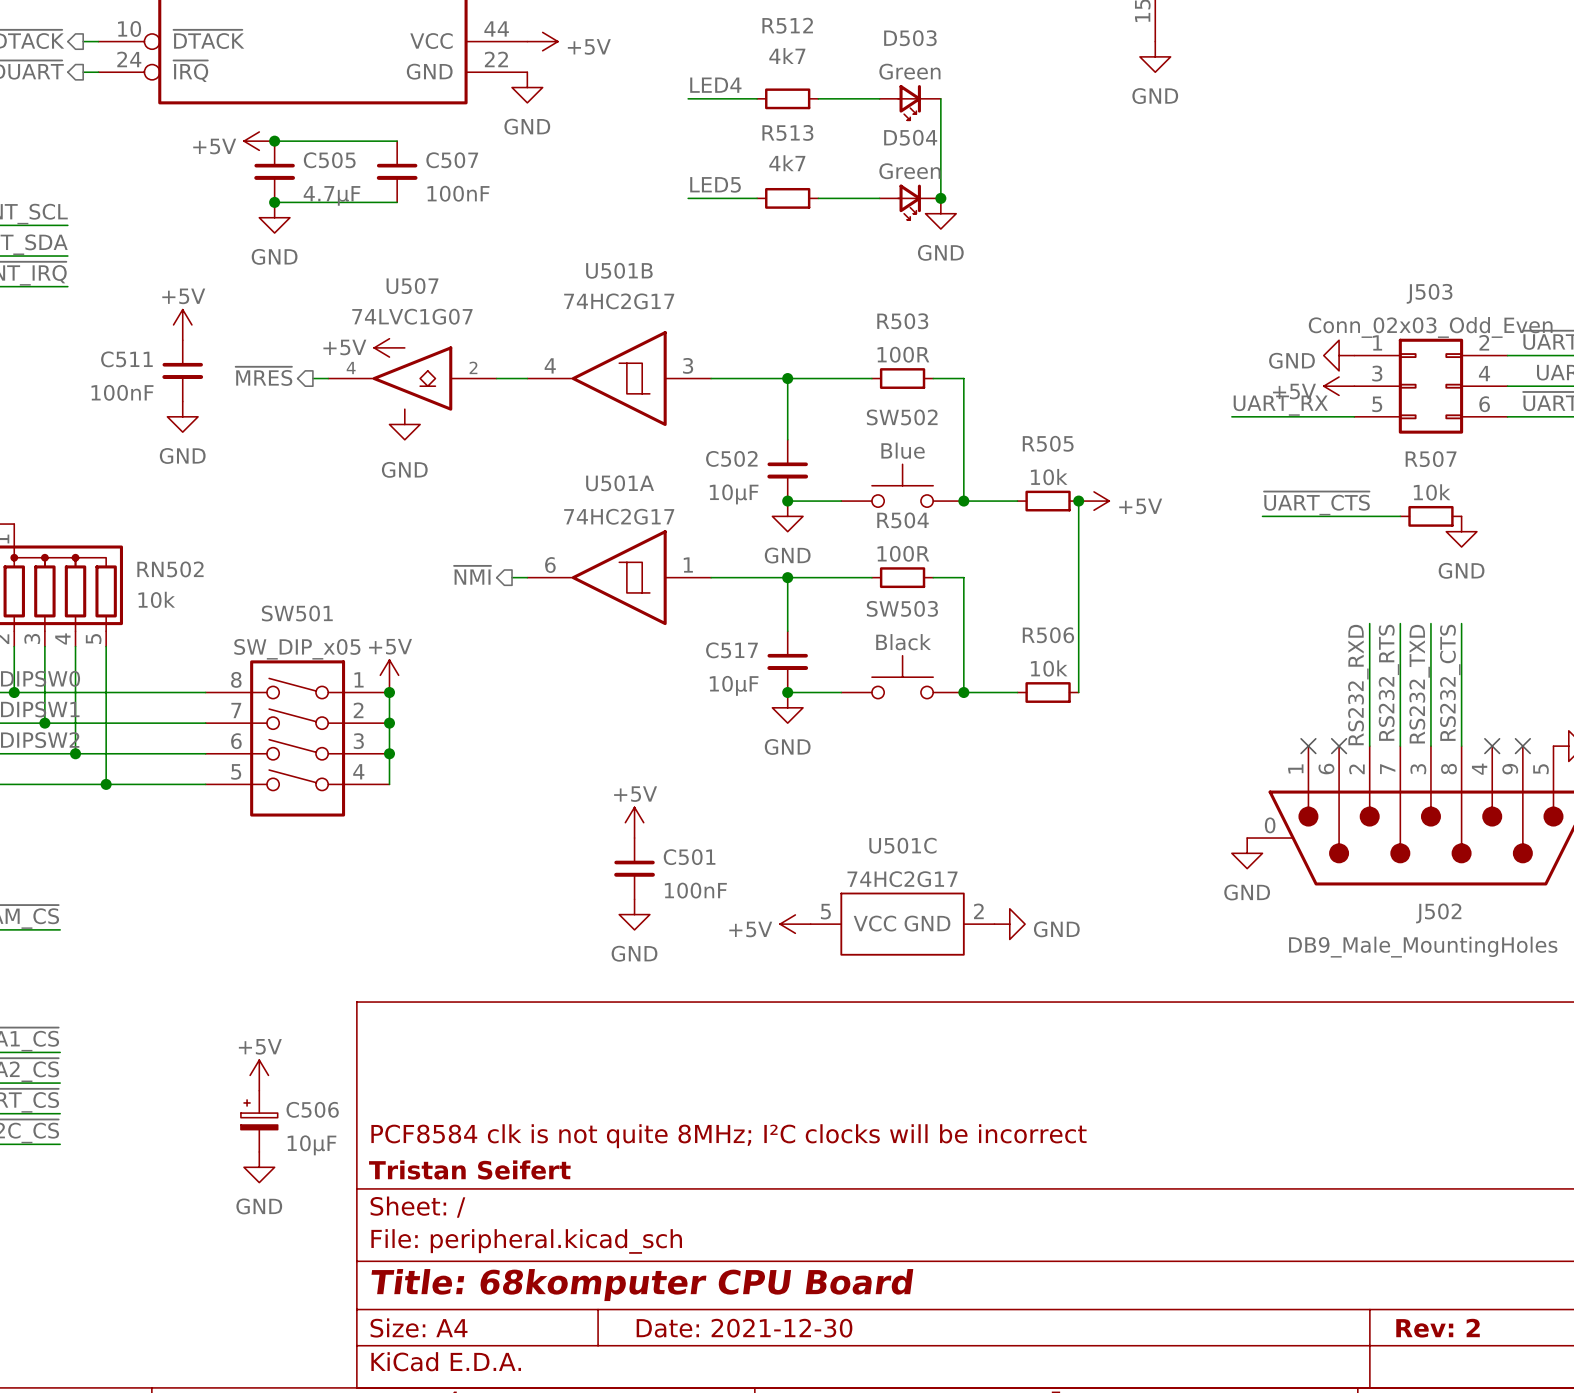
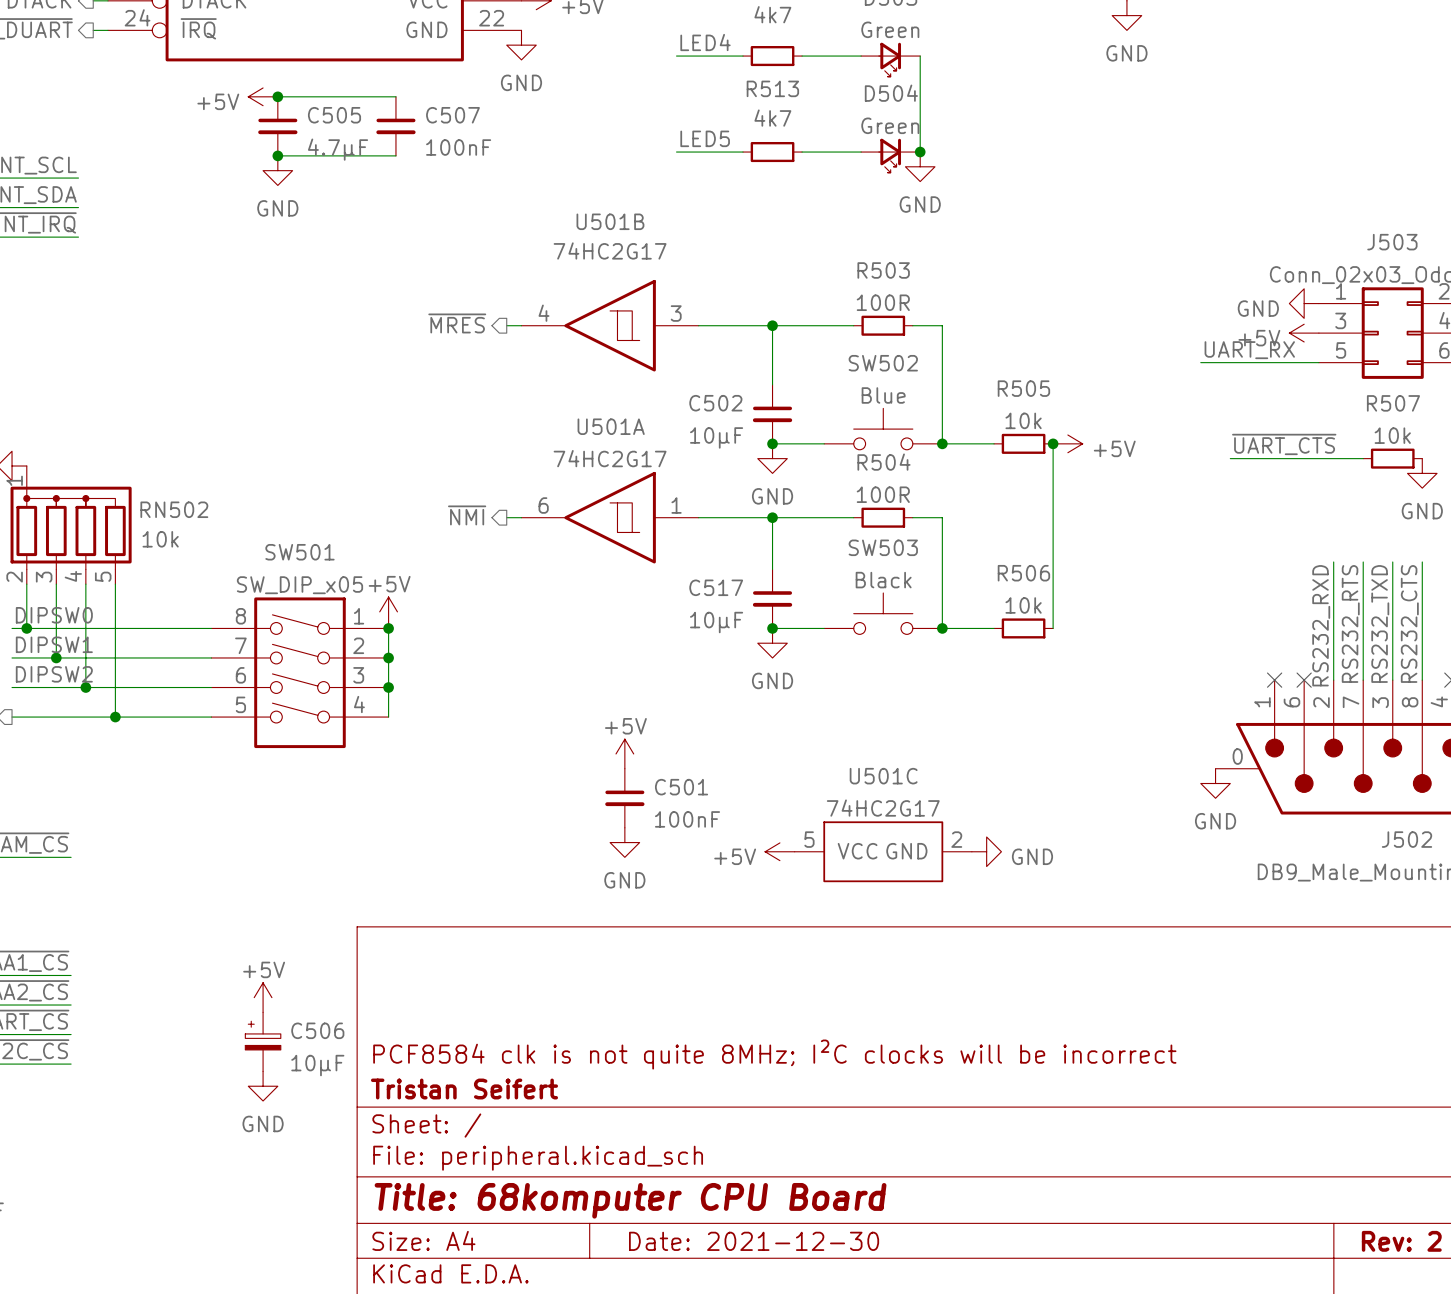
power symbol: +5V (182, 324) -> none
power symbol: +5V (389, 347) -> none
C511: 100nF (182, 370) -> none
hierarchical label position: ~{MRES} (263, 376) -> ~{MRES} (457, 323)
wire: (312, 378) (328, 378) -> none
U507: 74LVC1G07 (412, 378) -> none
wire: (496, 378) (512, 378) -> none
power symbol: GND (182, 416) -> none
power symbol: GND (404, 424) -> none

